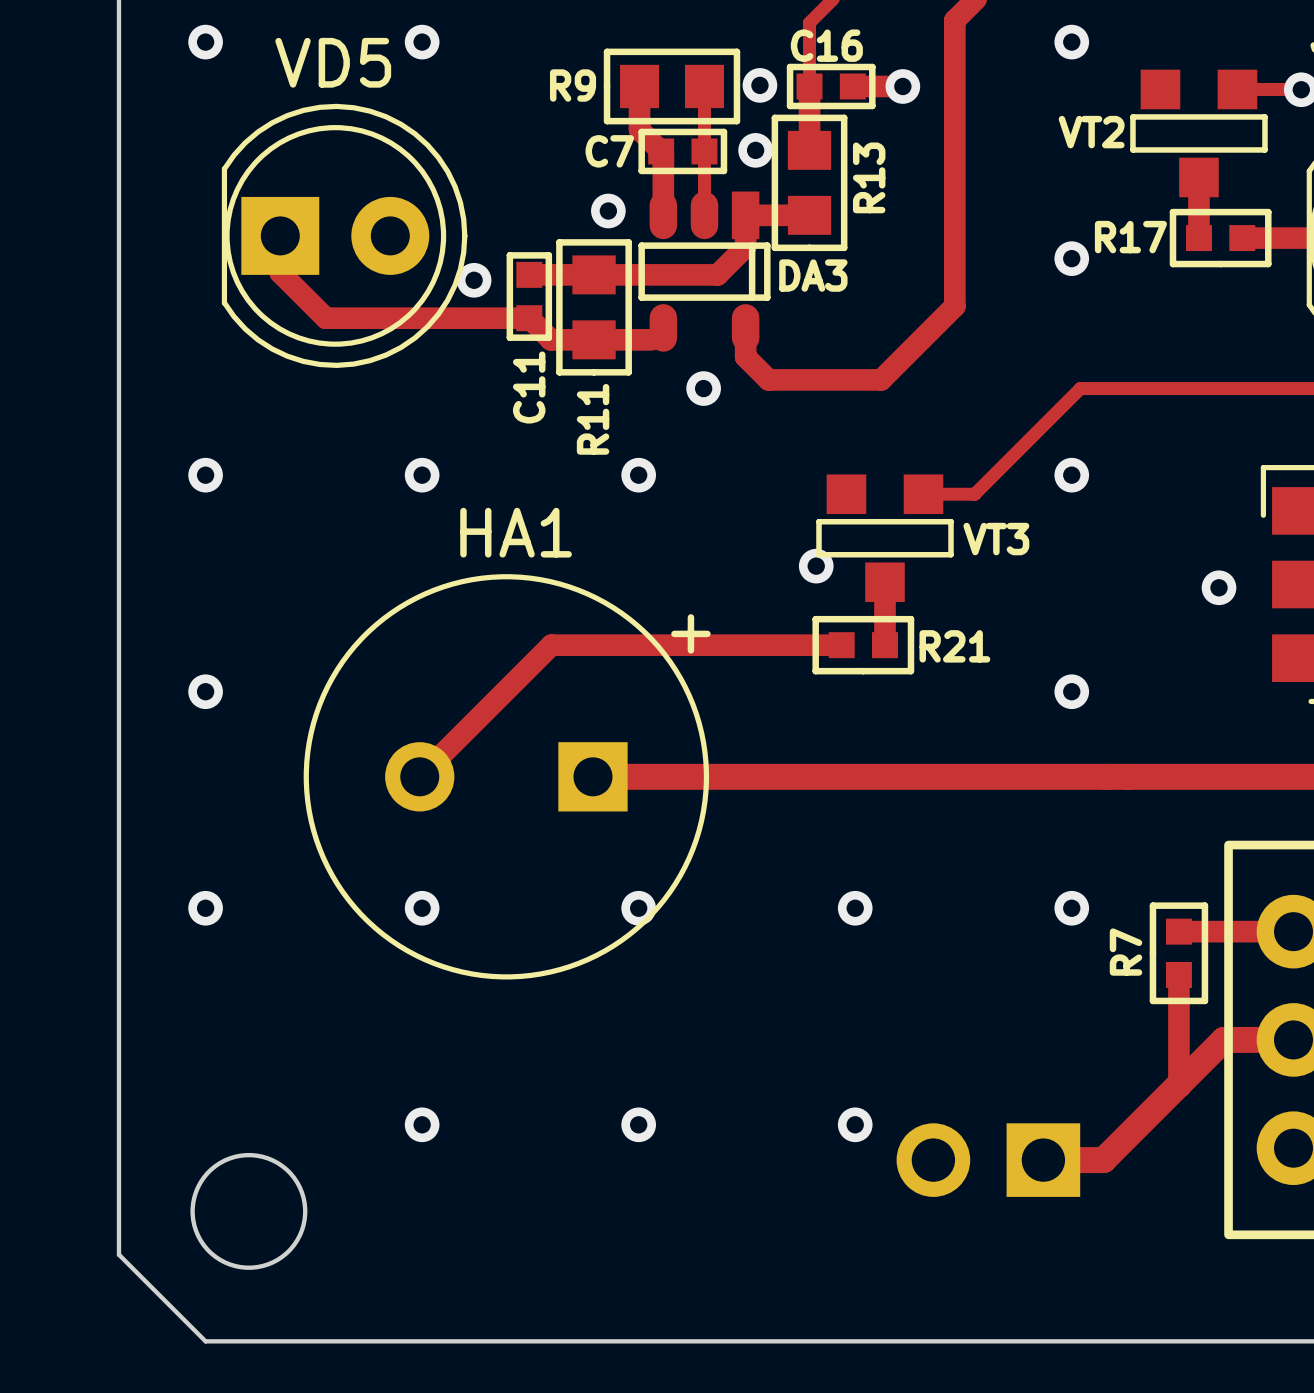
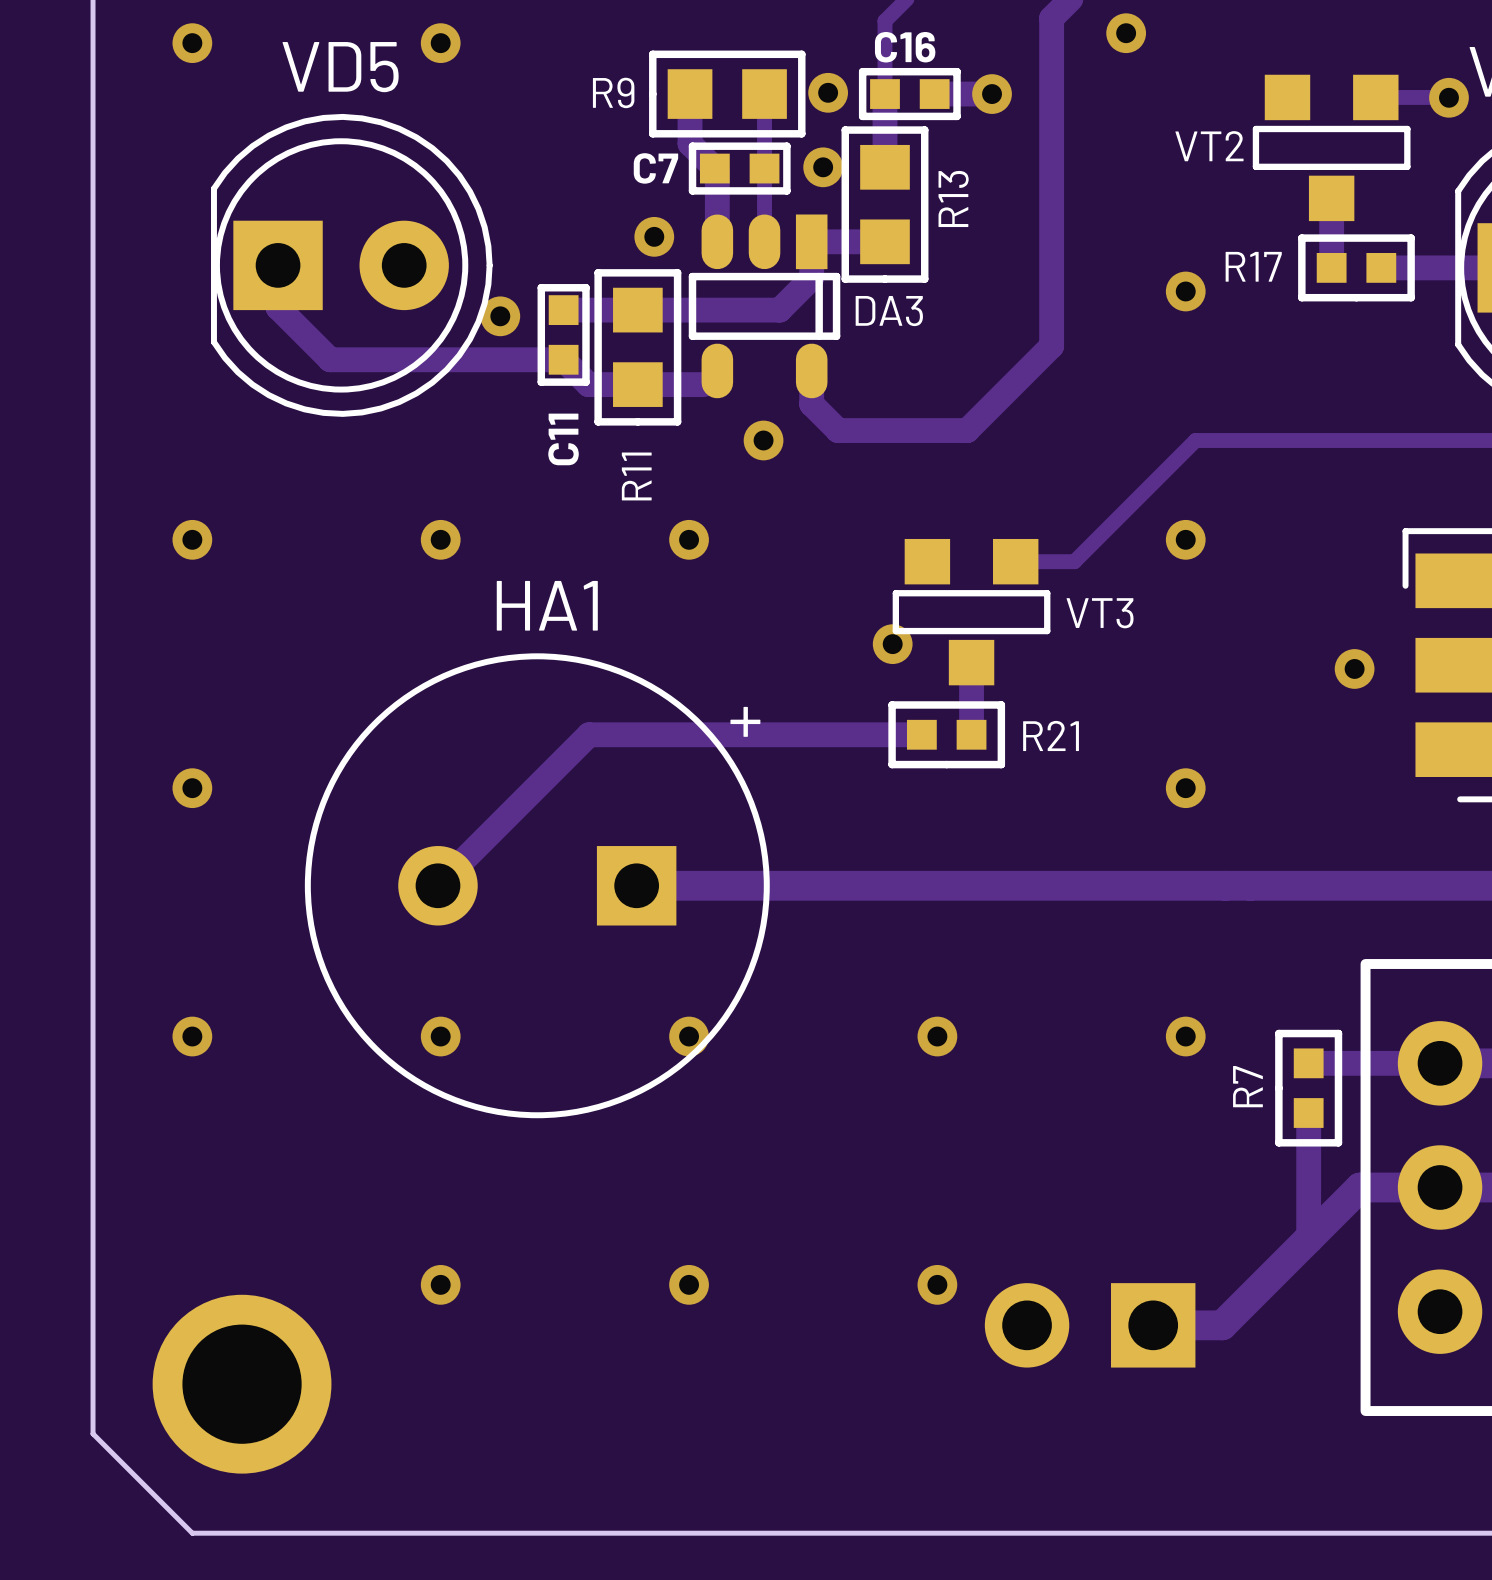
via position: (1071, 42) -> (1126, 33)
round board edge: [190, 1152, 308, 1270] -> none
part: none -> (242, 1384)

